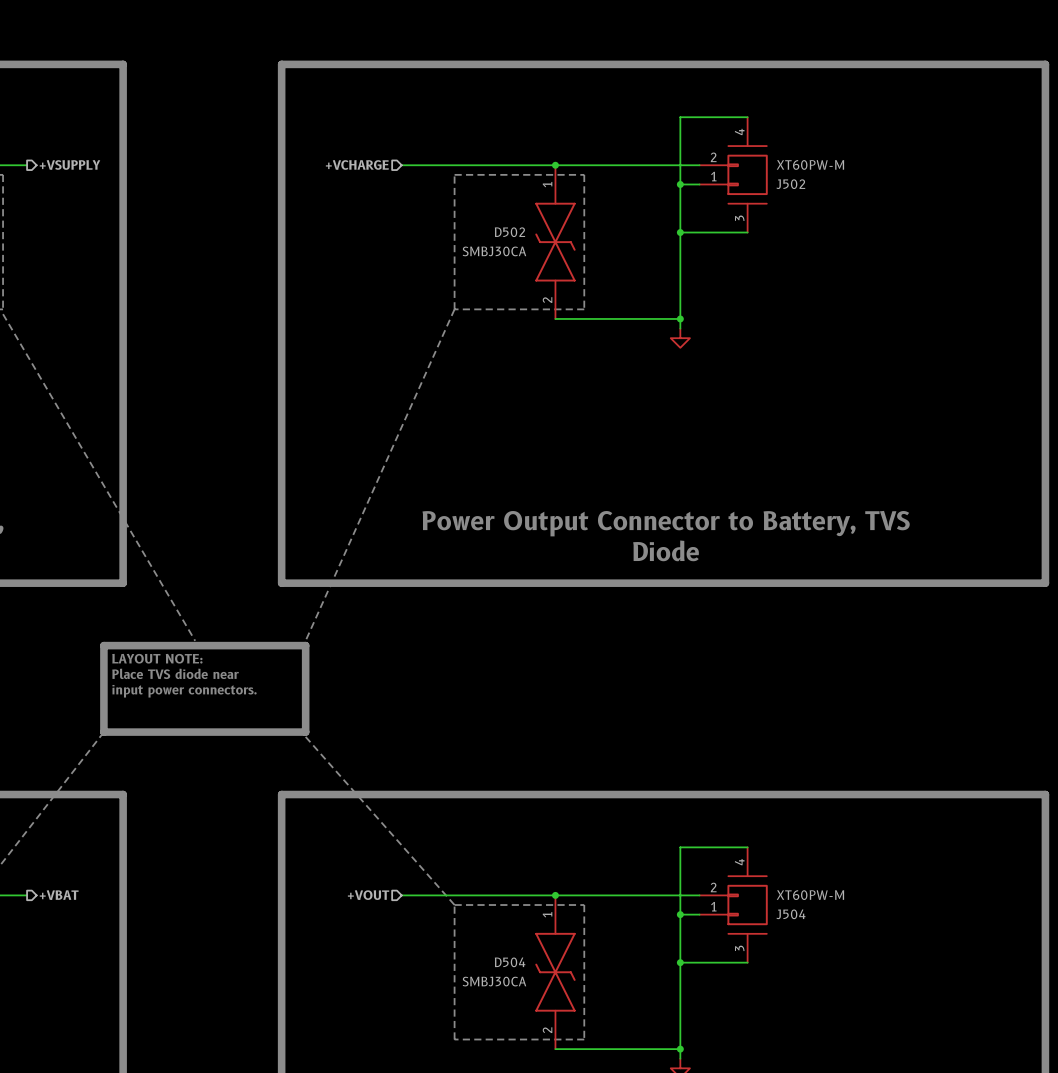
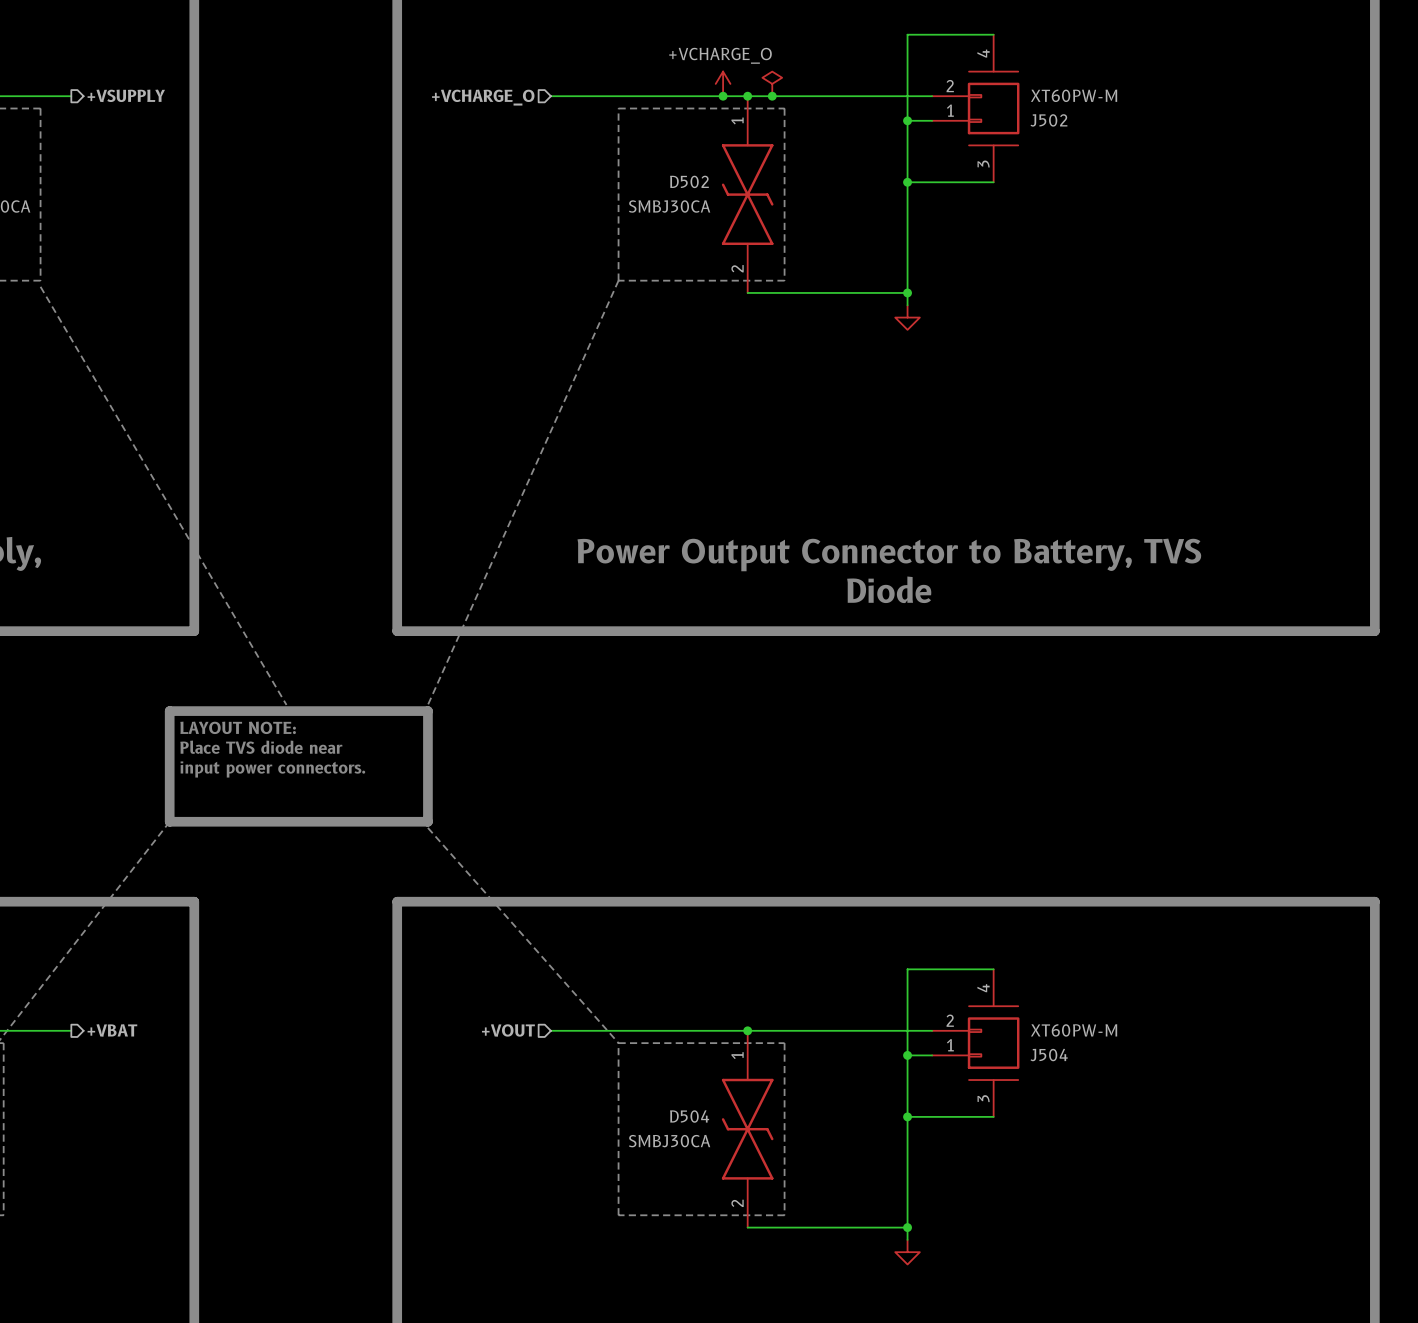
power symbol: none -> +VCHARGE_O (723, 83)
power symbol: none -> (772, 83)
hierarchical label: +VCHARGE (357, 164) -> +VCHARGE_O (483, 97)
junction: none -> (723, 96)
junction: none -> (772, 96)

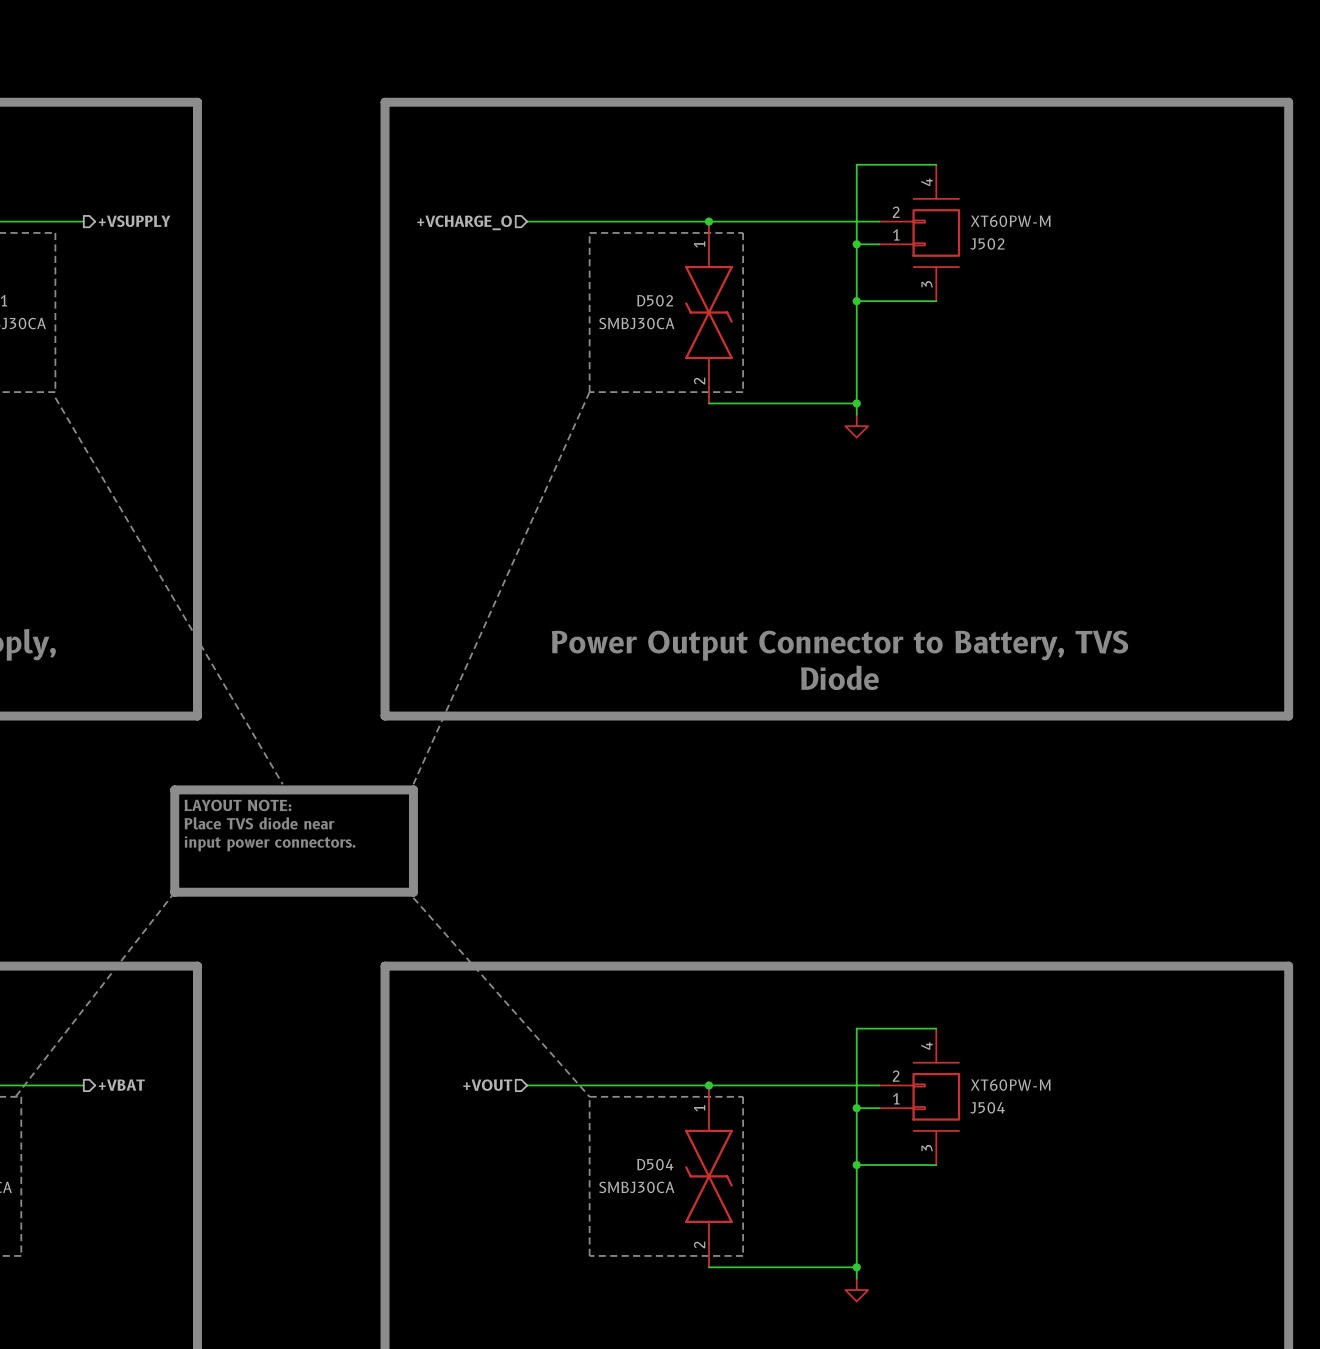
power symbol: +VCHARGE_O (723, 83) -> none
power symbol: (772, 83) -> none
junction: (723, 96) -> none
junction: (772, 96) -> none

